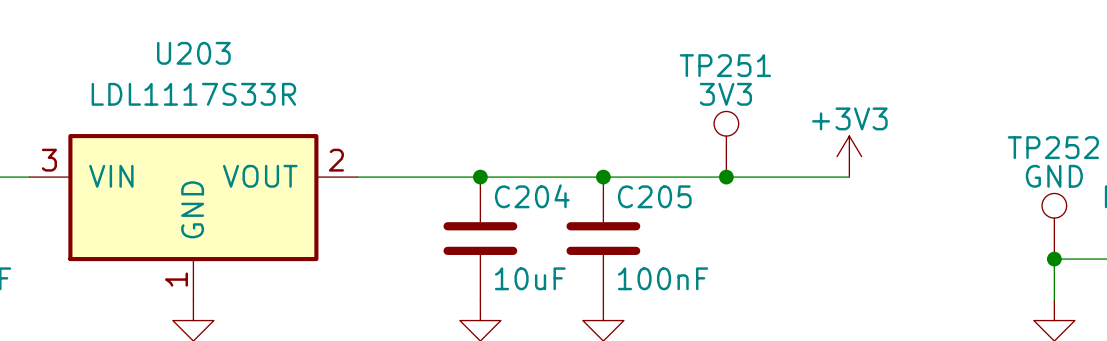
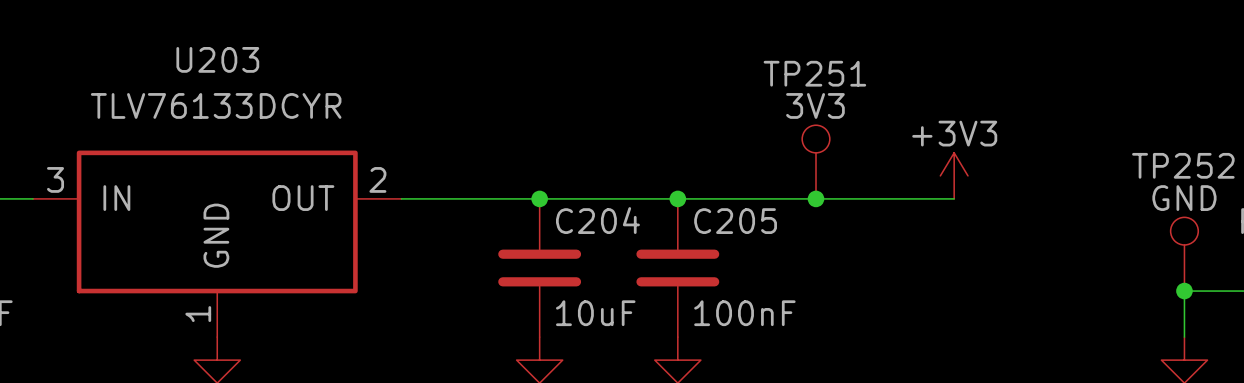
U203 value: LDL1117S33R (193, 94) -> TLV76133DCYR (216, 105)
U203 pin name: VIN (111, 176) -> IN (116, 198)
U203 pin name: VOUT (260, 176) -> OUT (303, 198)

